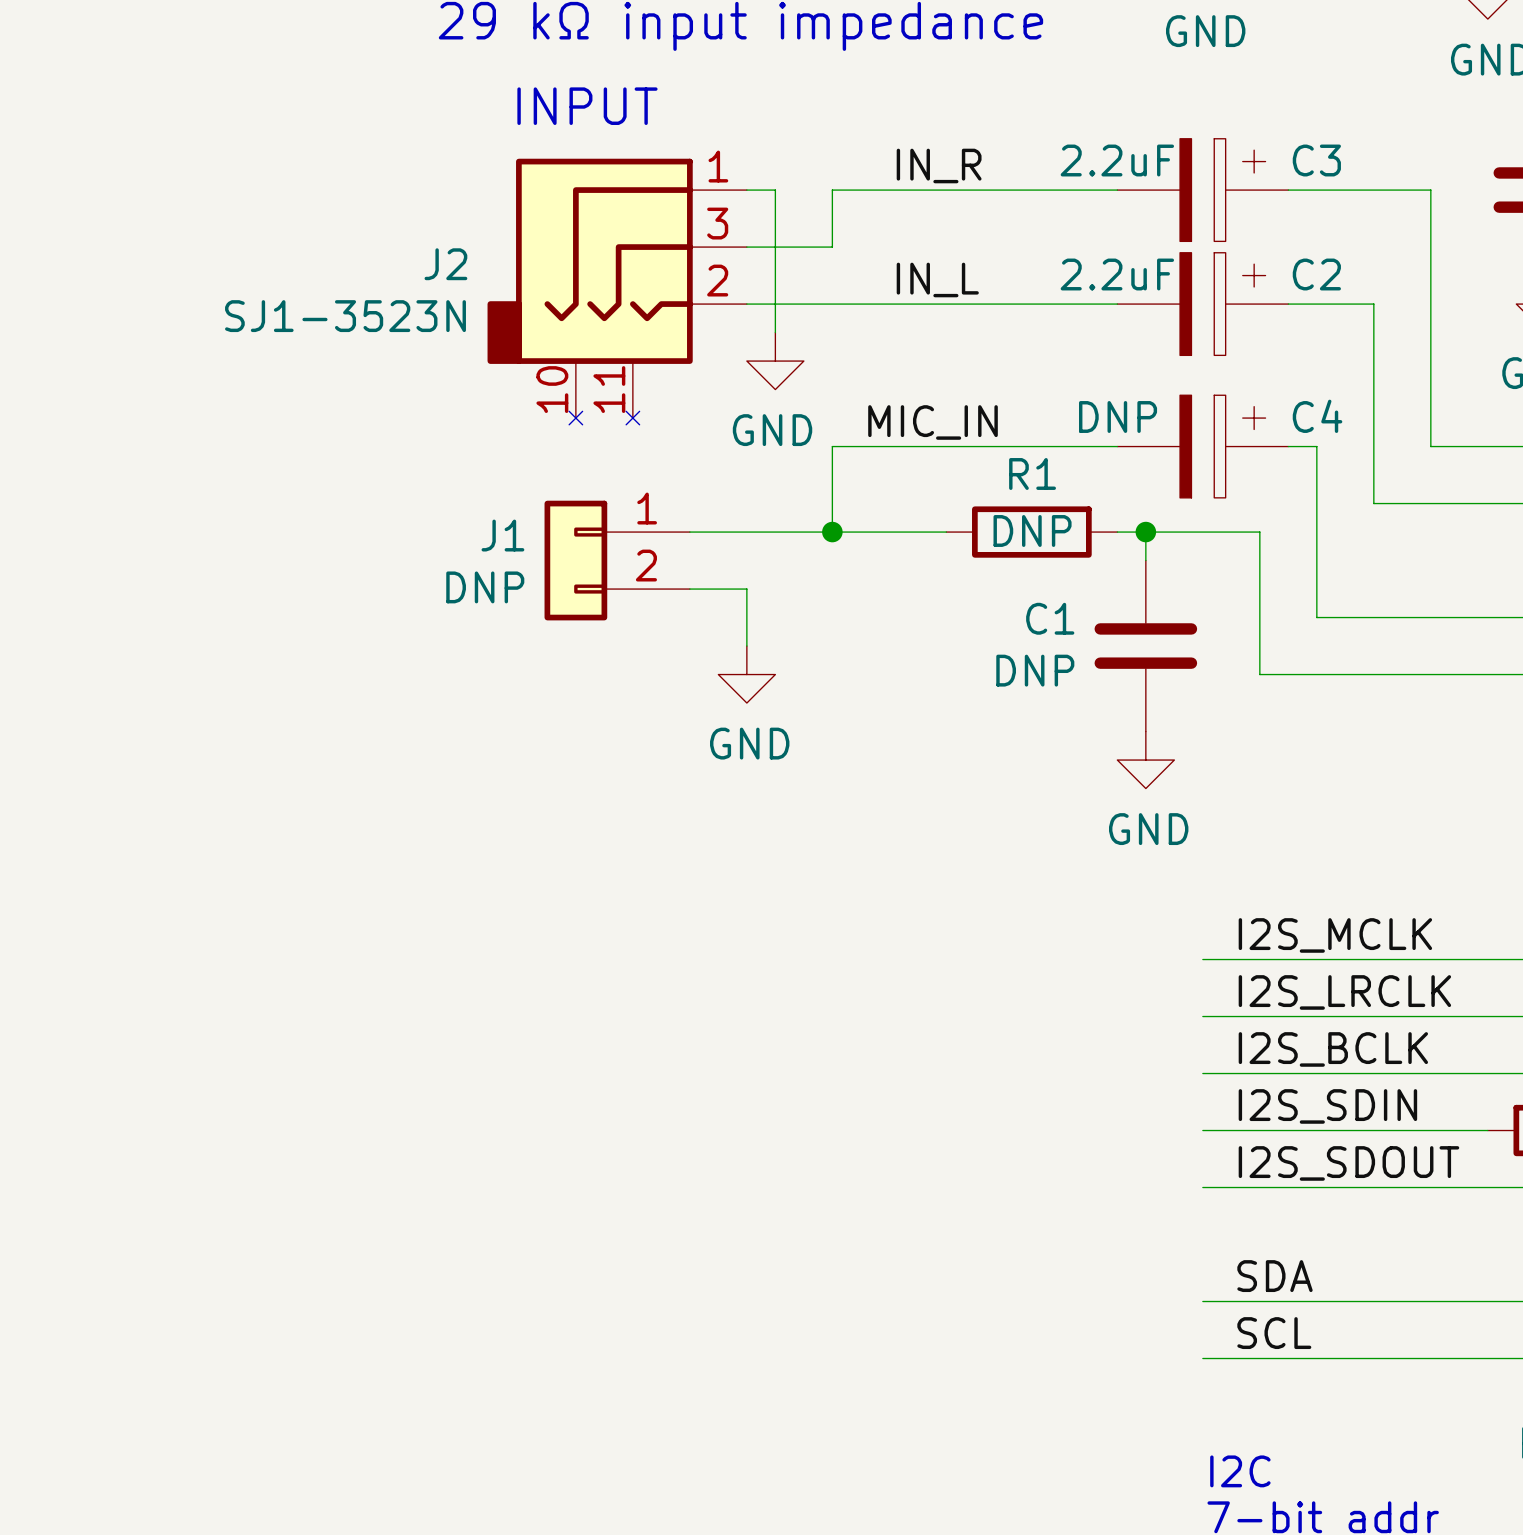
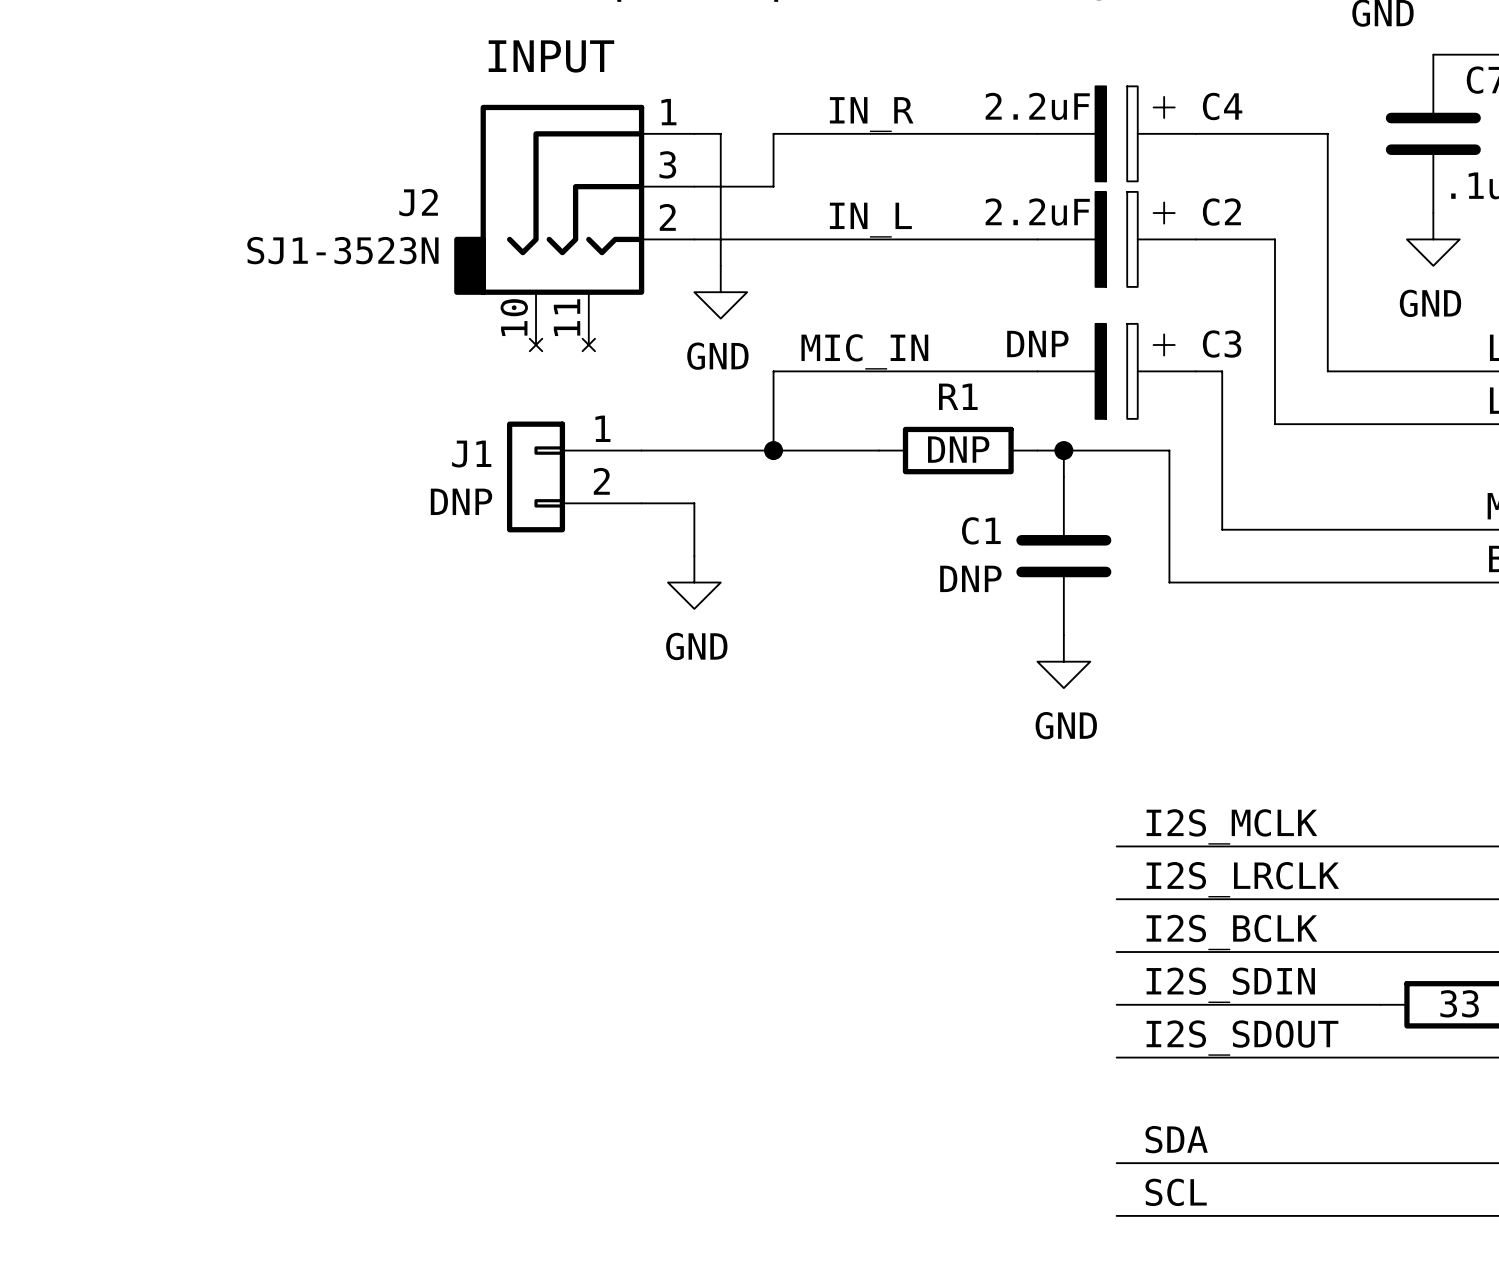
C3 name: C3 (1316, 160) -> C4 (1222, 106)
C4 name: C4 (1317, 416) -> C3 (1222, 344)

